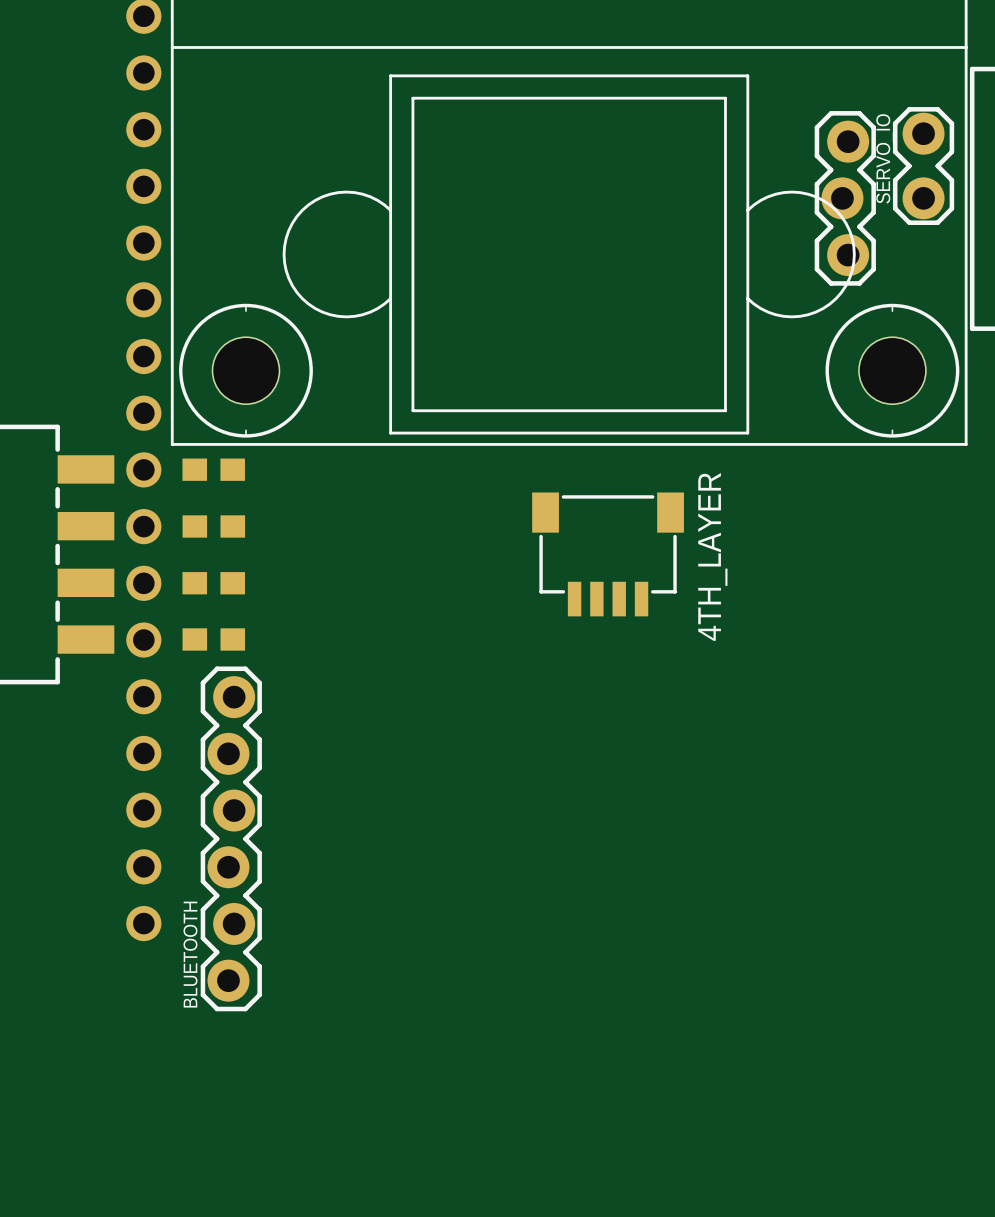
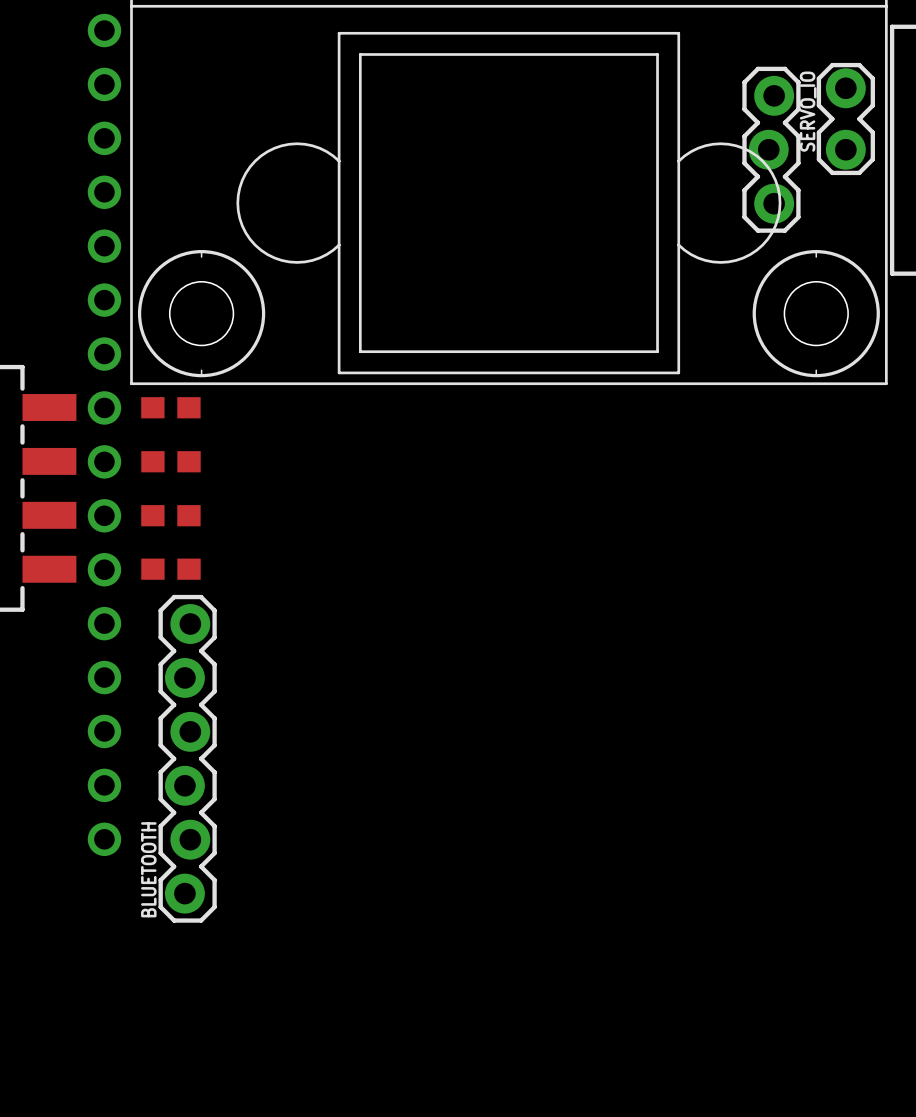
4TH_LAYER: (608, 554) -> none

